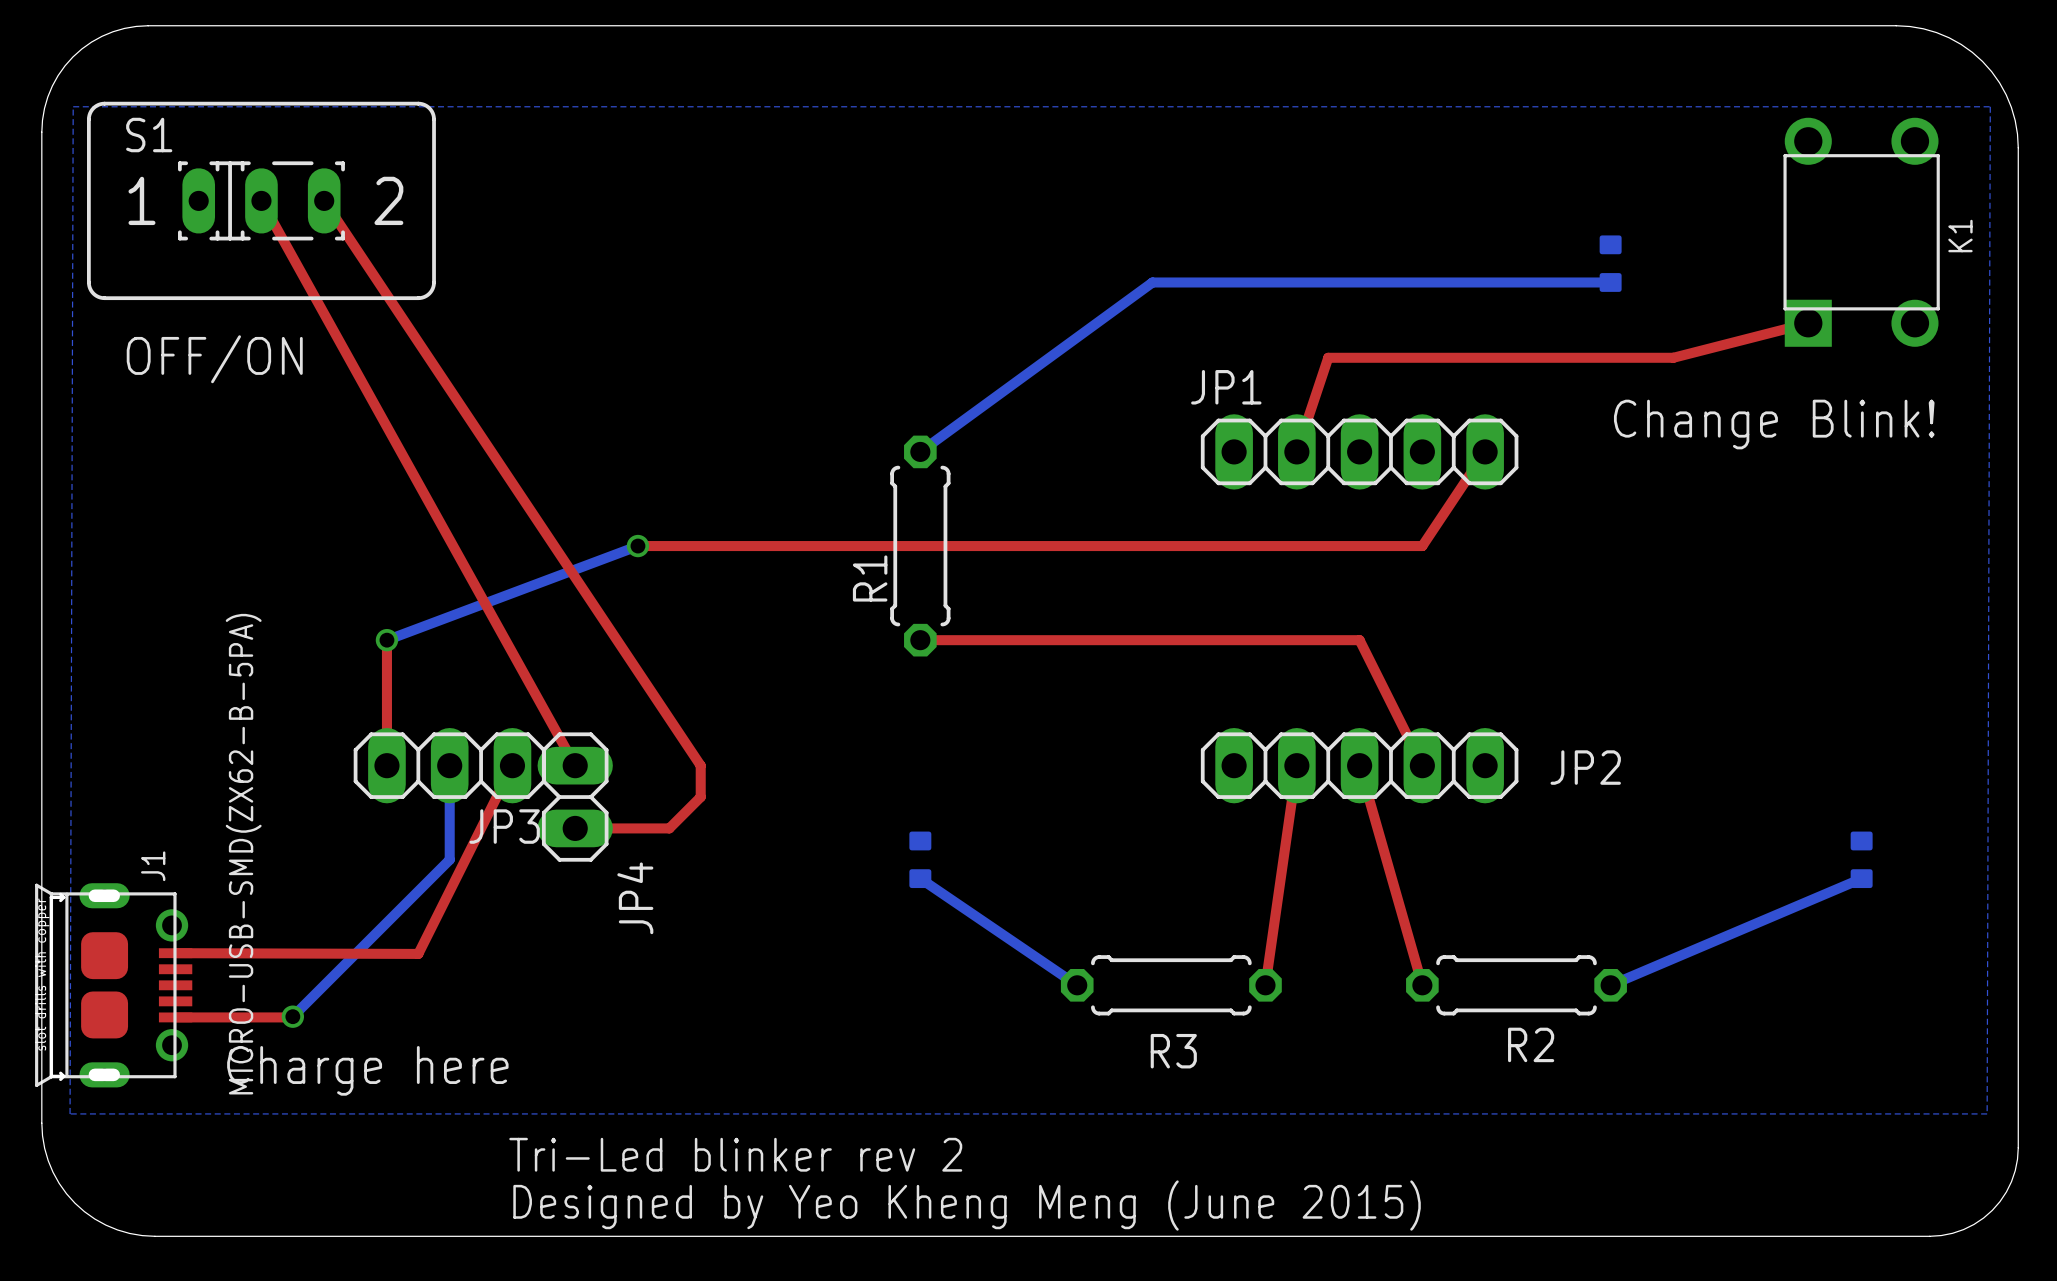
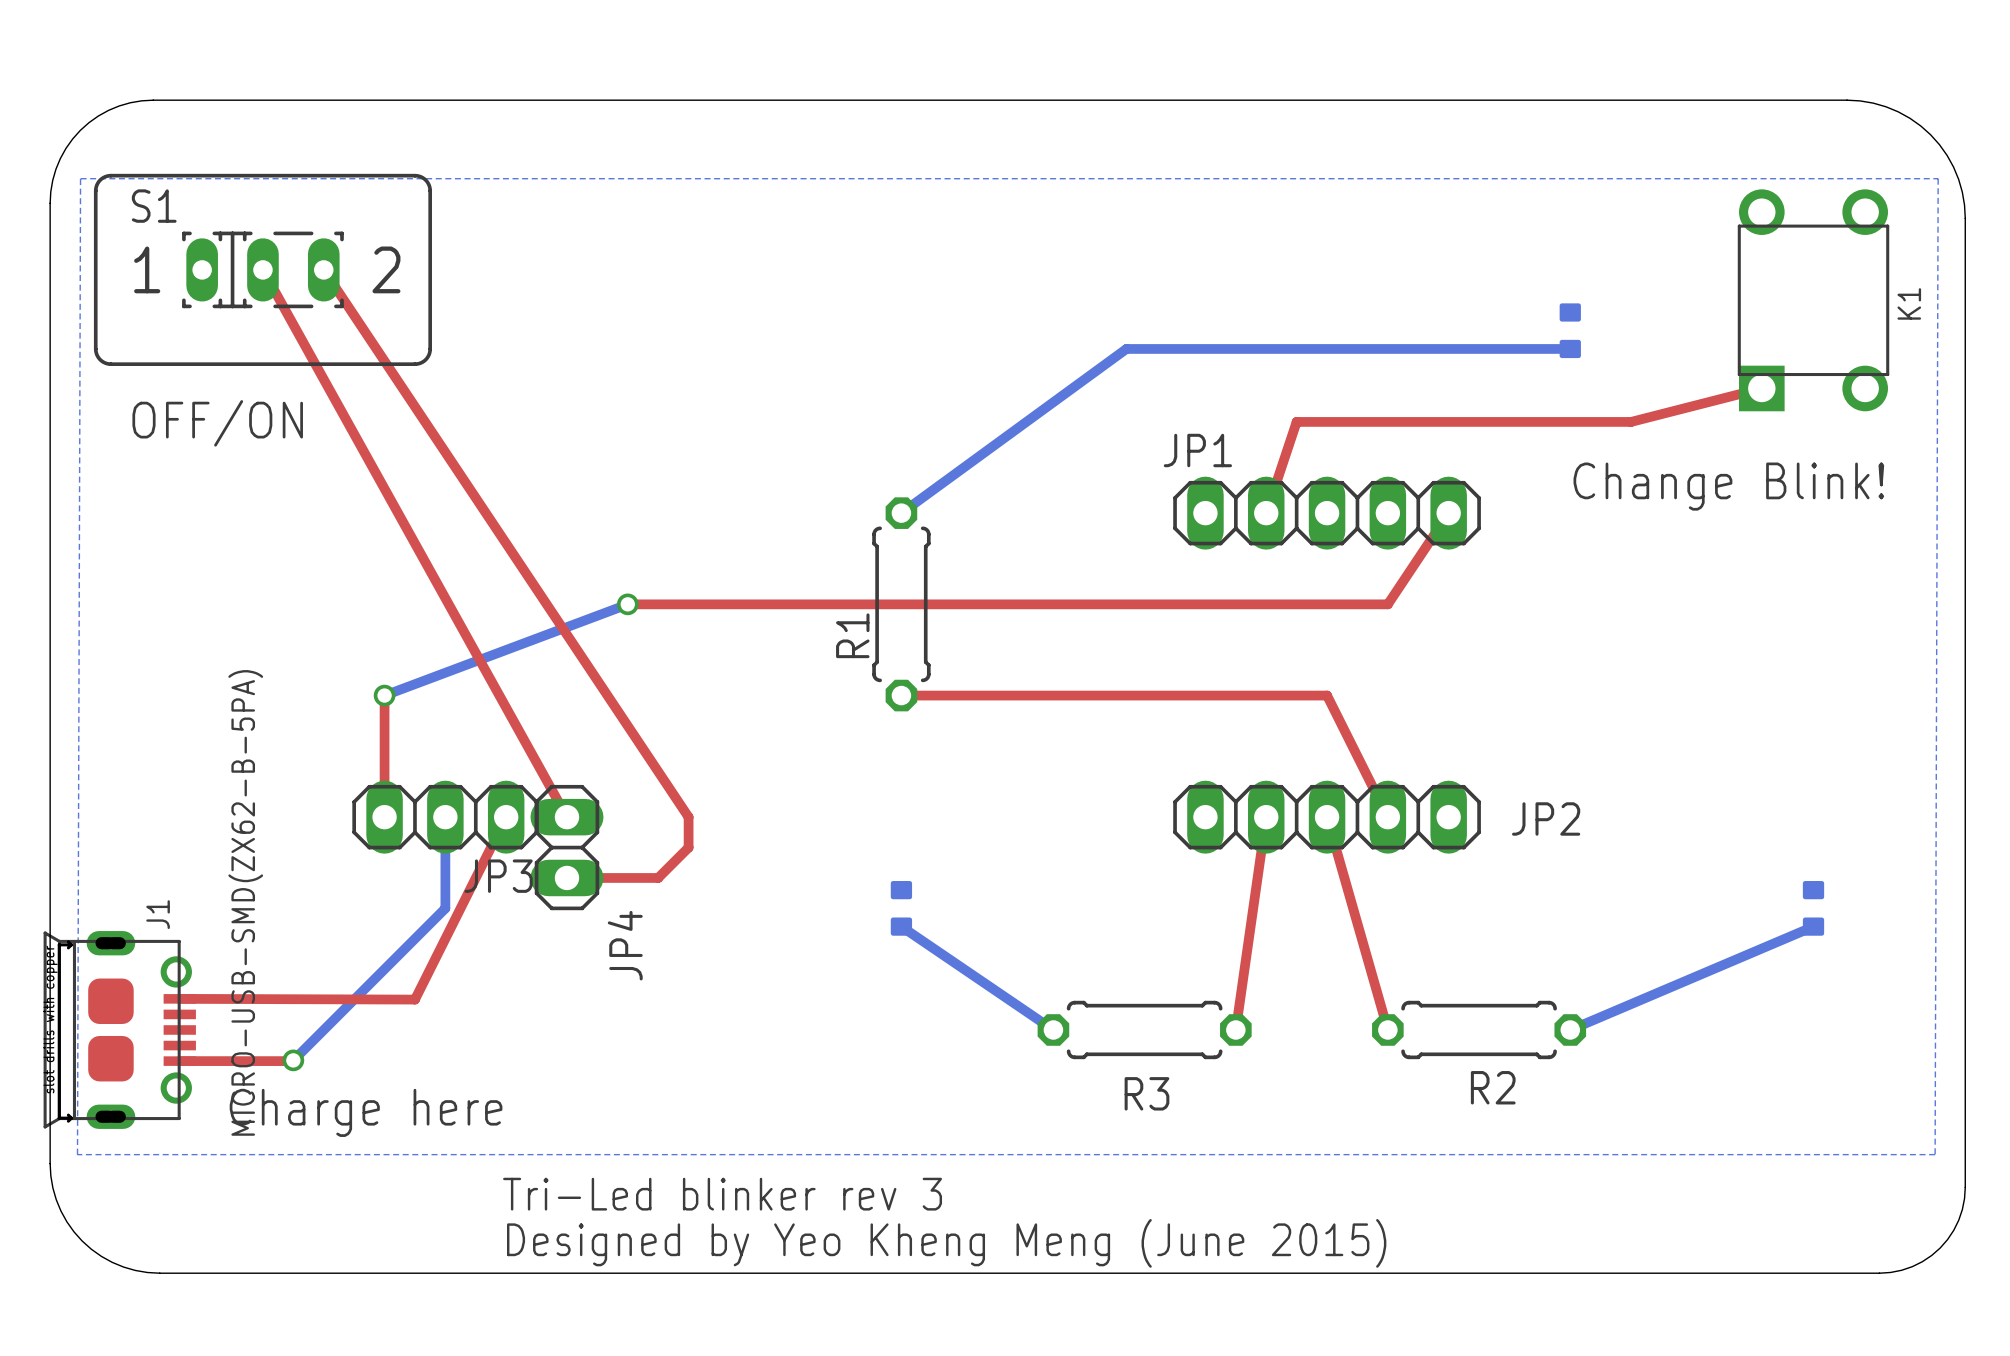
text: Tri-Led blinker rev 2 (735, 1154) -> Tri-Led blinker rev 3 (722, 1194)

